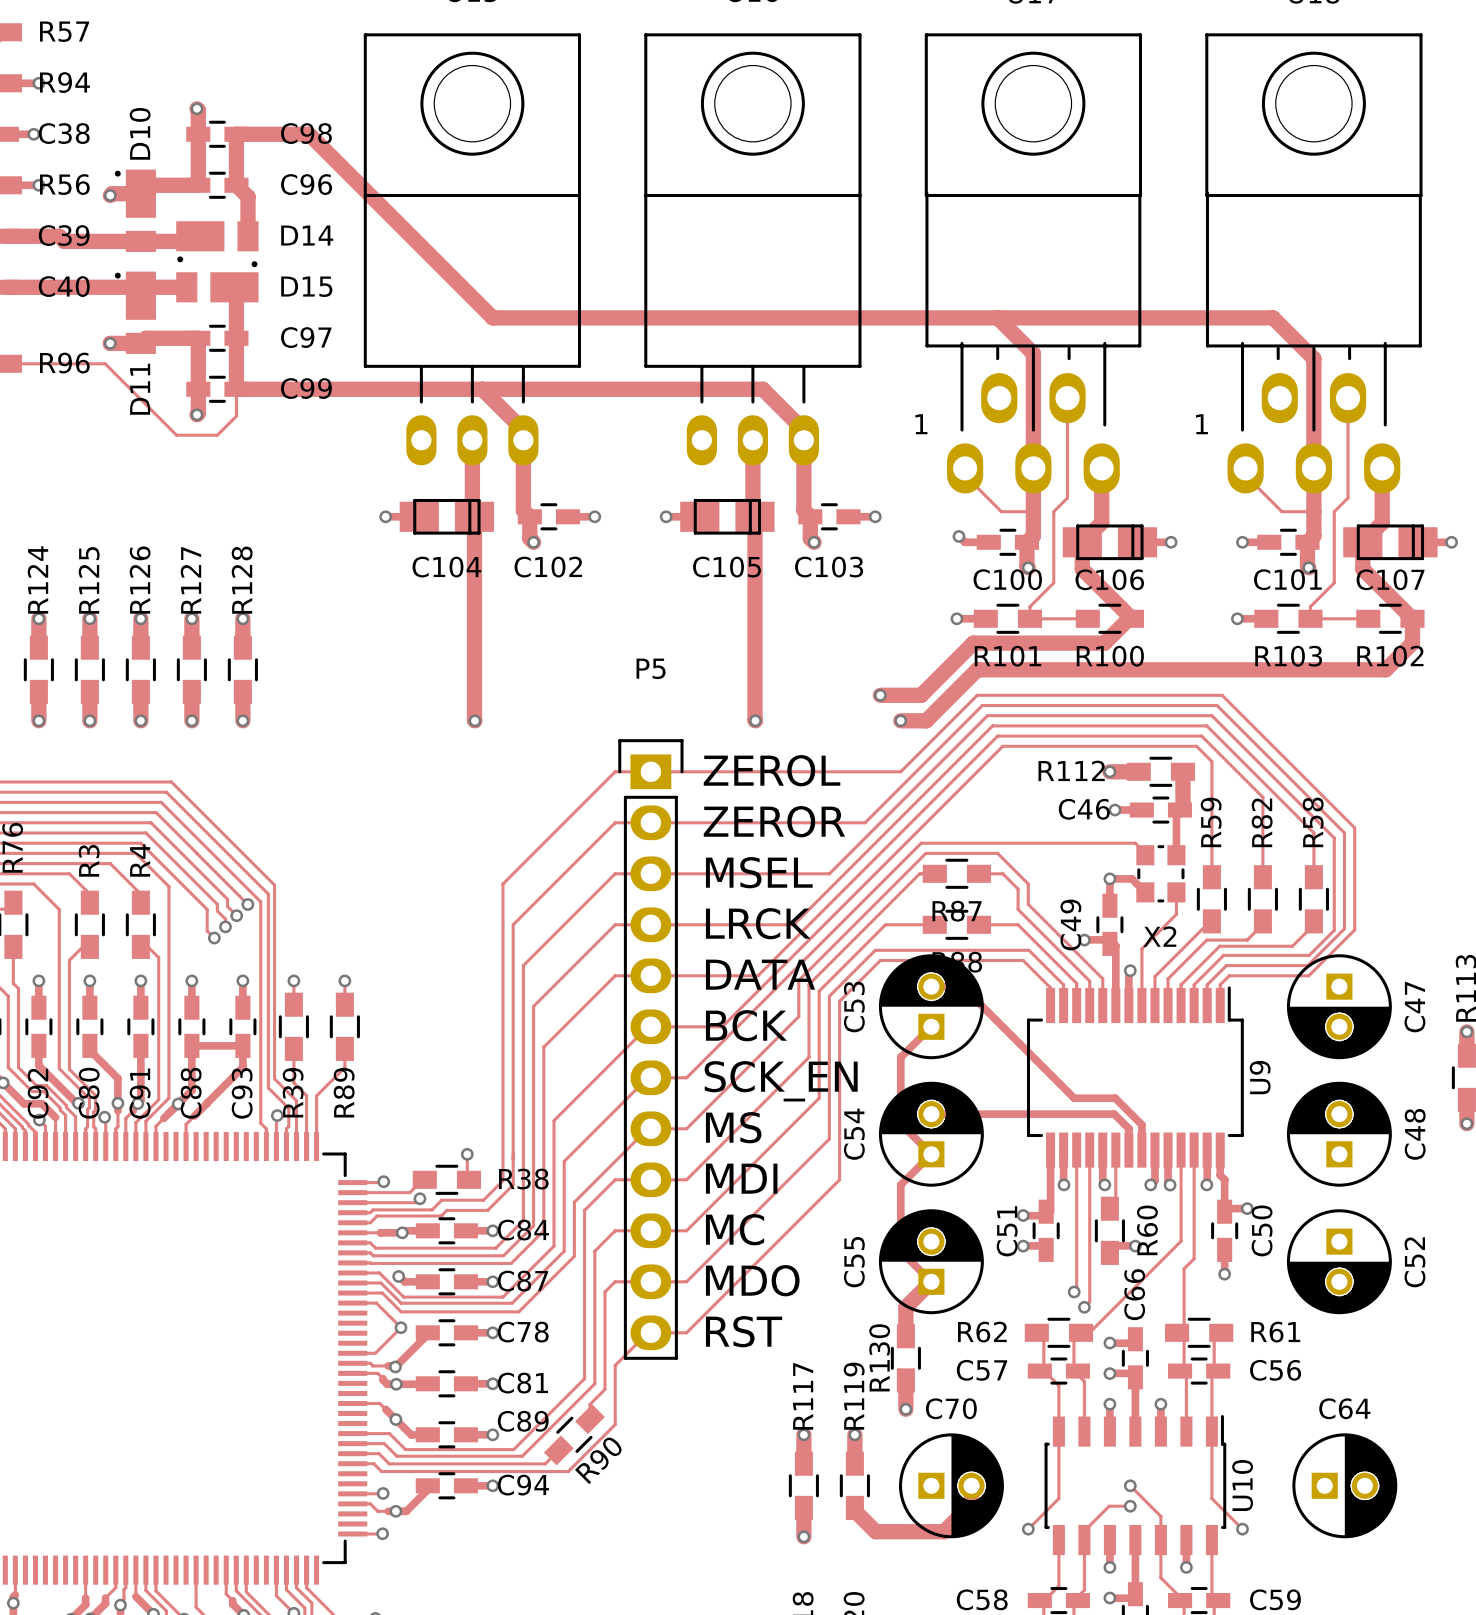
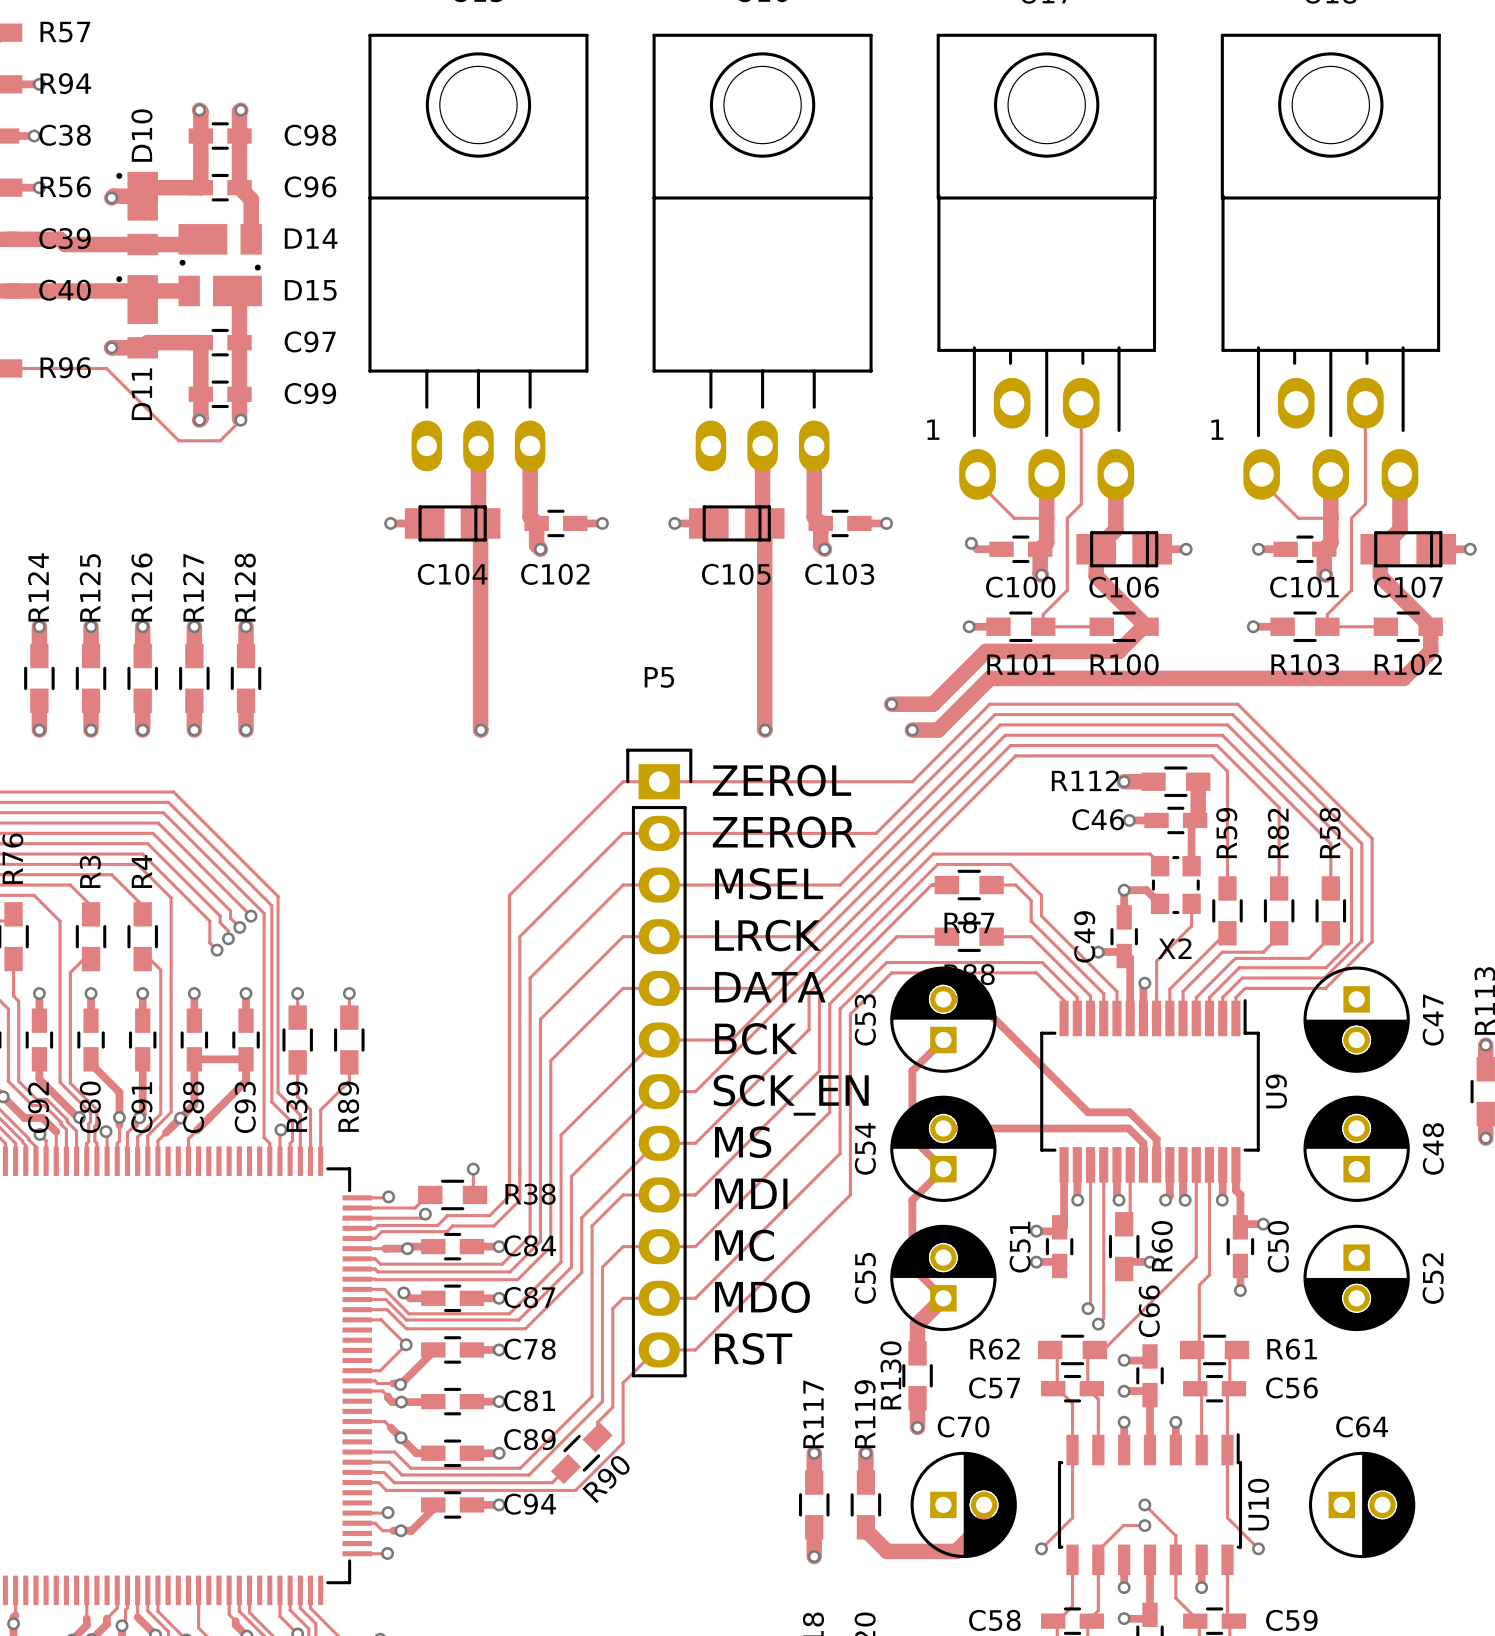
via: none -> (240, 110)
track: (236, 134) (309, 134) (492, 317) (1273, 317) (1313, 358) (1313, 468) -> (239, 136) (240, 110)
track: (997, 317) (1033, 353) (1033, 468) -> none
track: (236, 389) (762, 389) (803, 430) (803, 440) -> none
track width: thin (236, 389) (236, 413) -> thick (239, 394) (239, 418)
track: (482, 389) (523, 430) (523, 440) -> none
via: none -> (240, 420)

